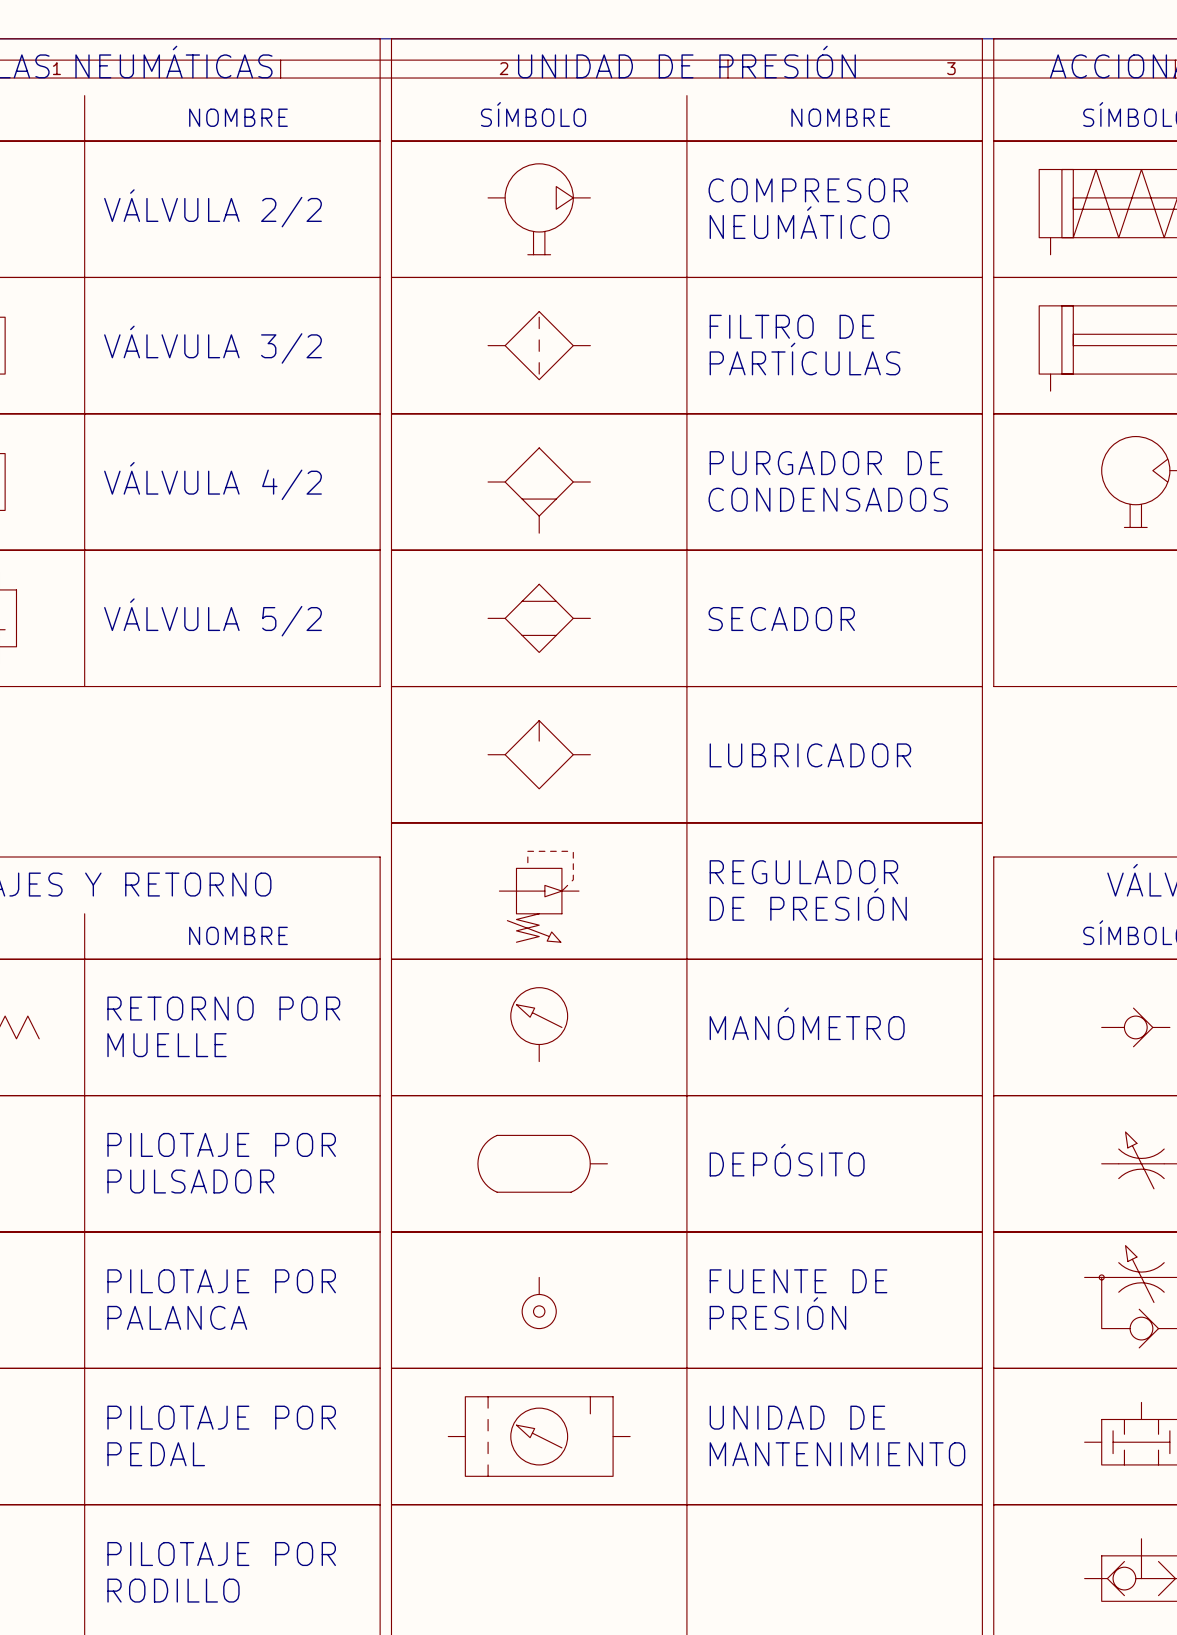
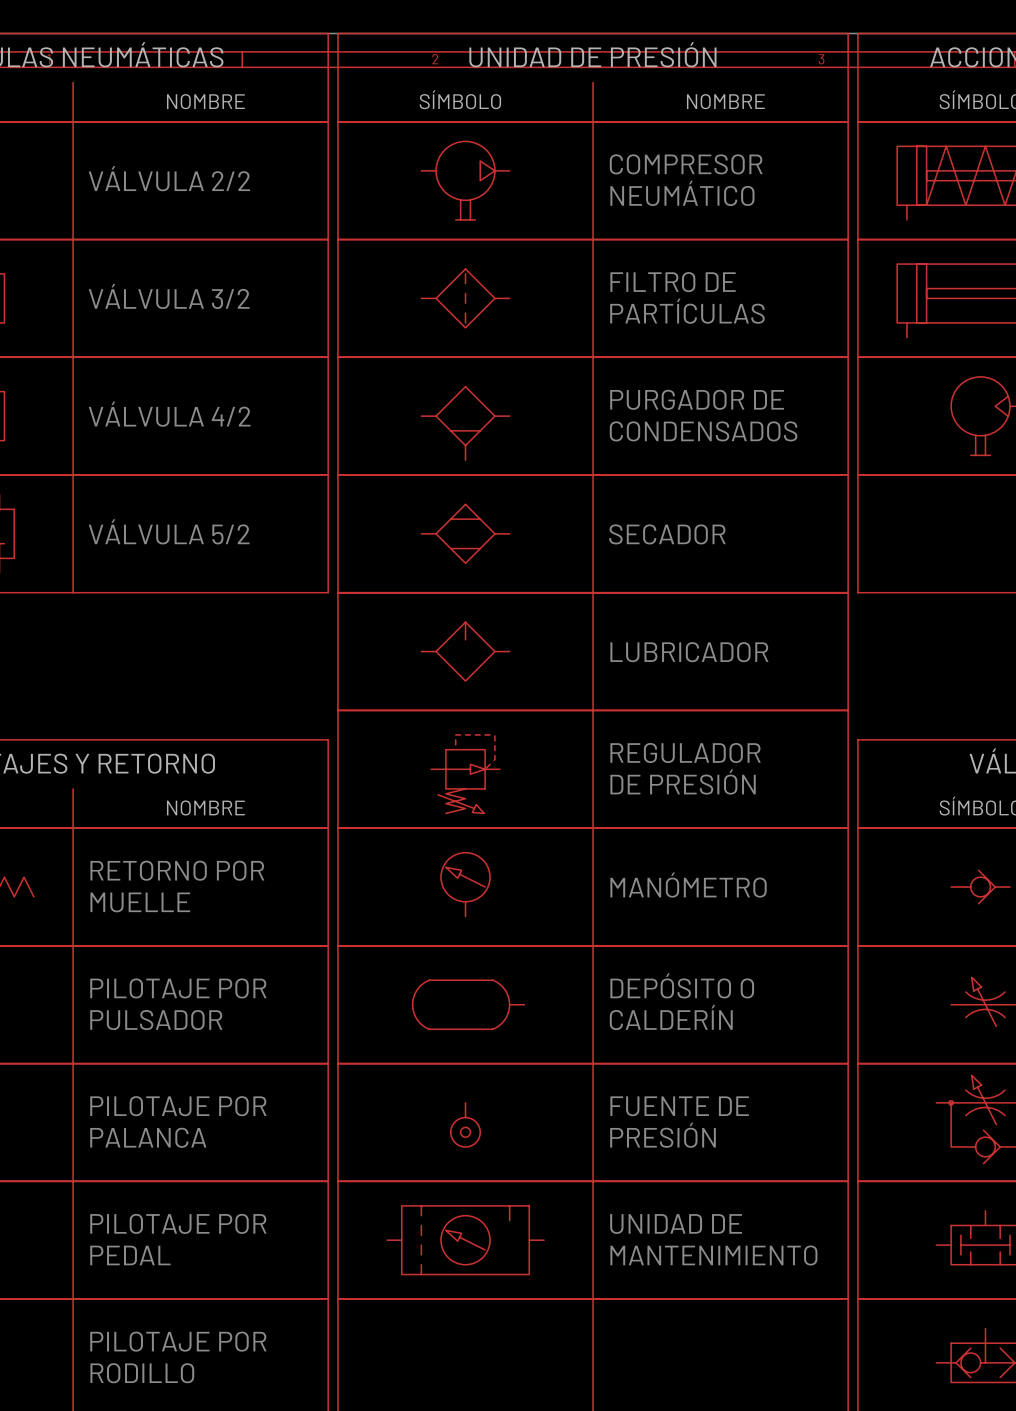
text: DEPÓSITO (787, 1160) -> DEPÓSITO O (682, 985)
text: none -> CALDERÍN (671, 1017)

